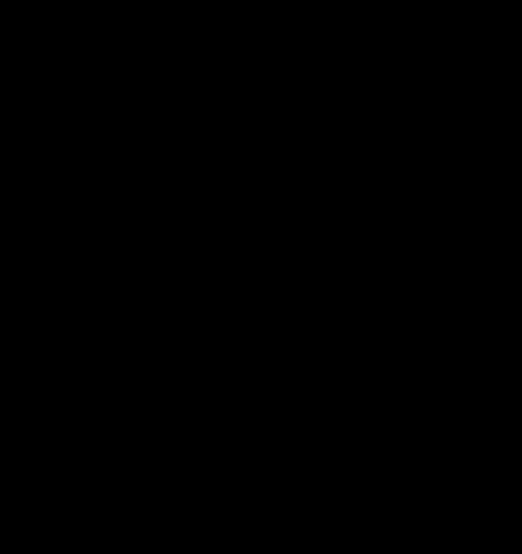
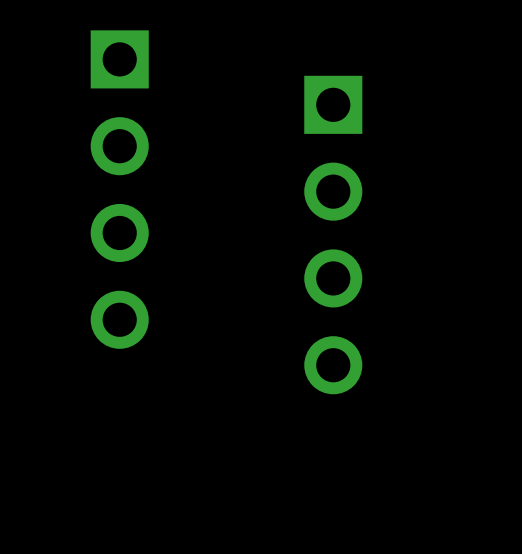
part: none -> (119, 189)
part: none -> (333, 235)

